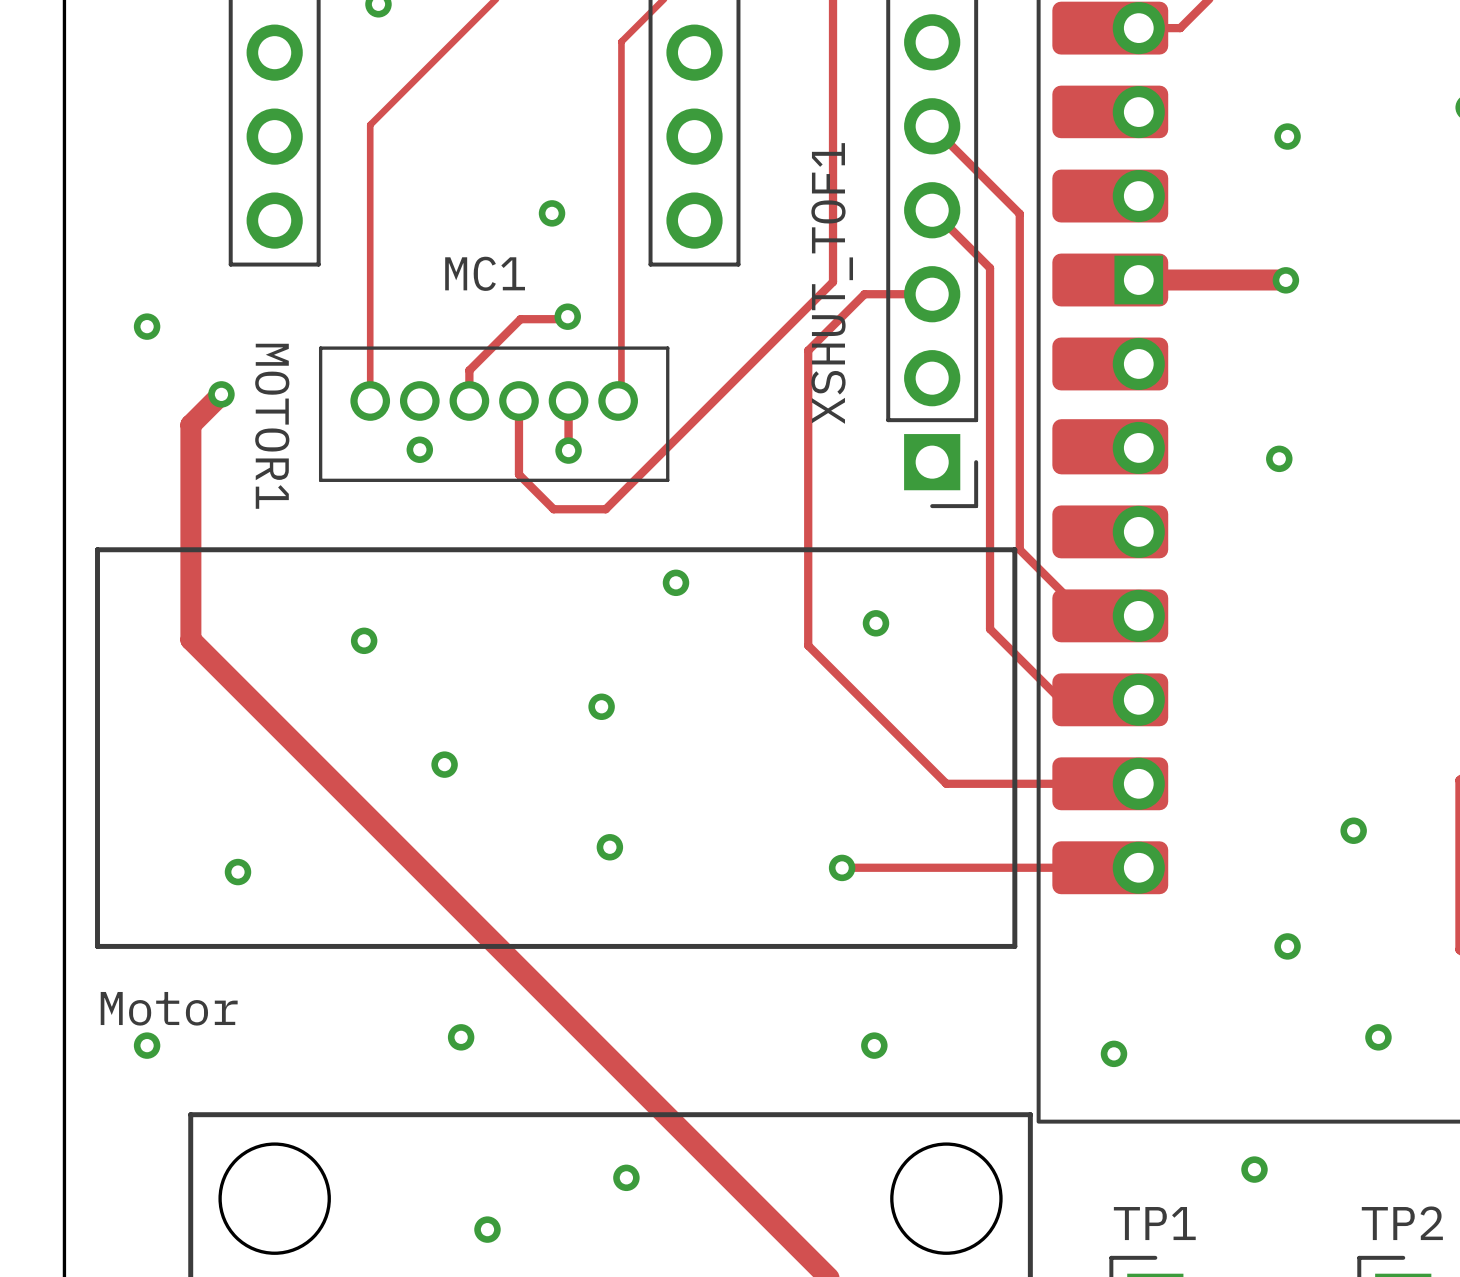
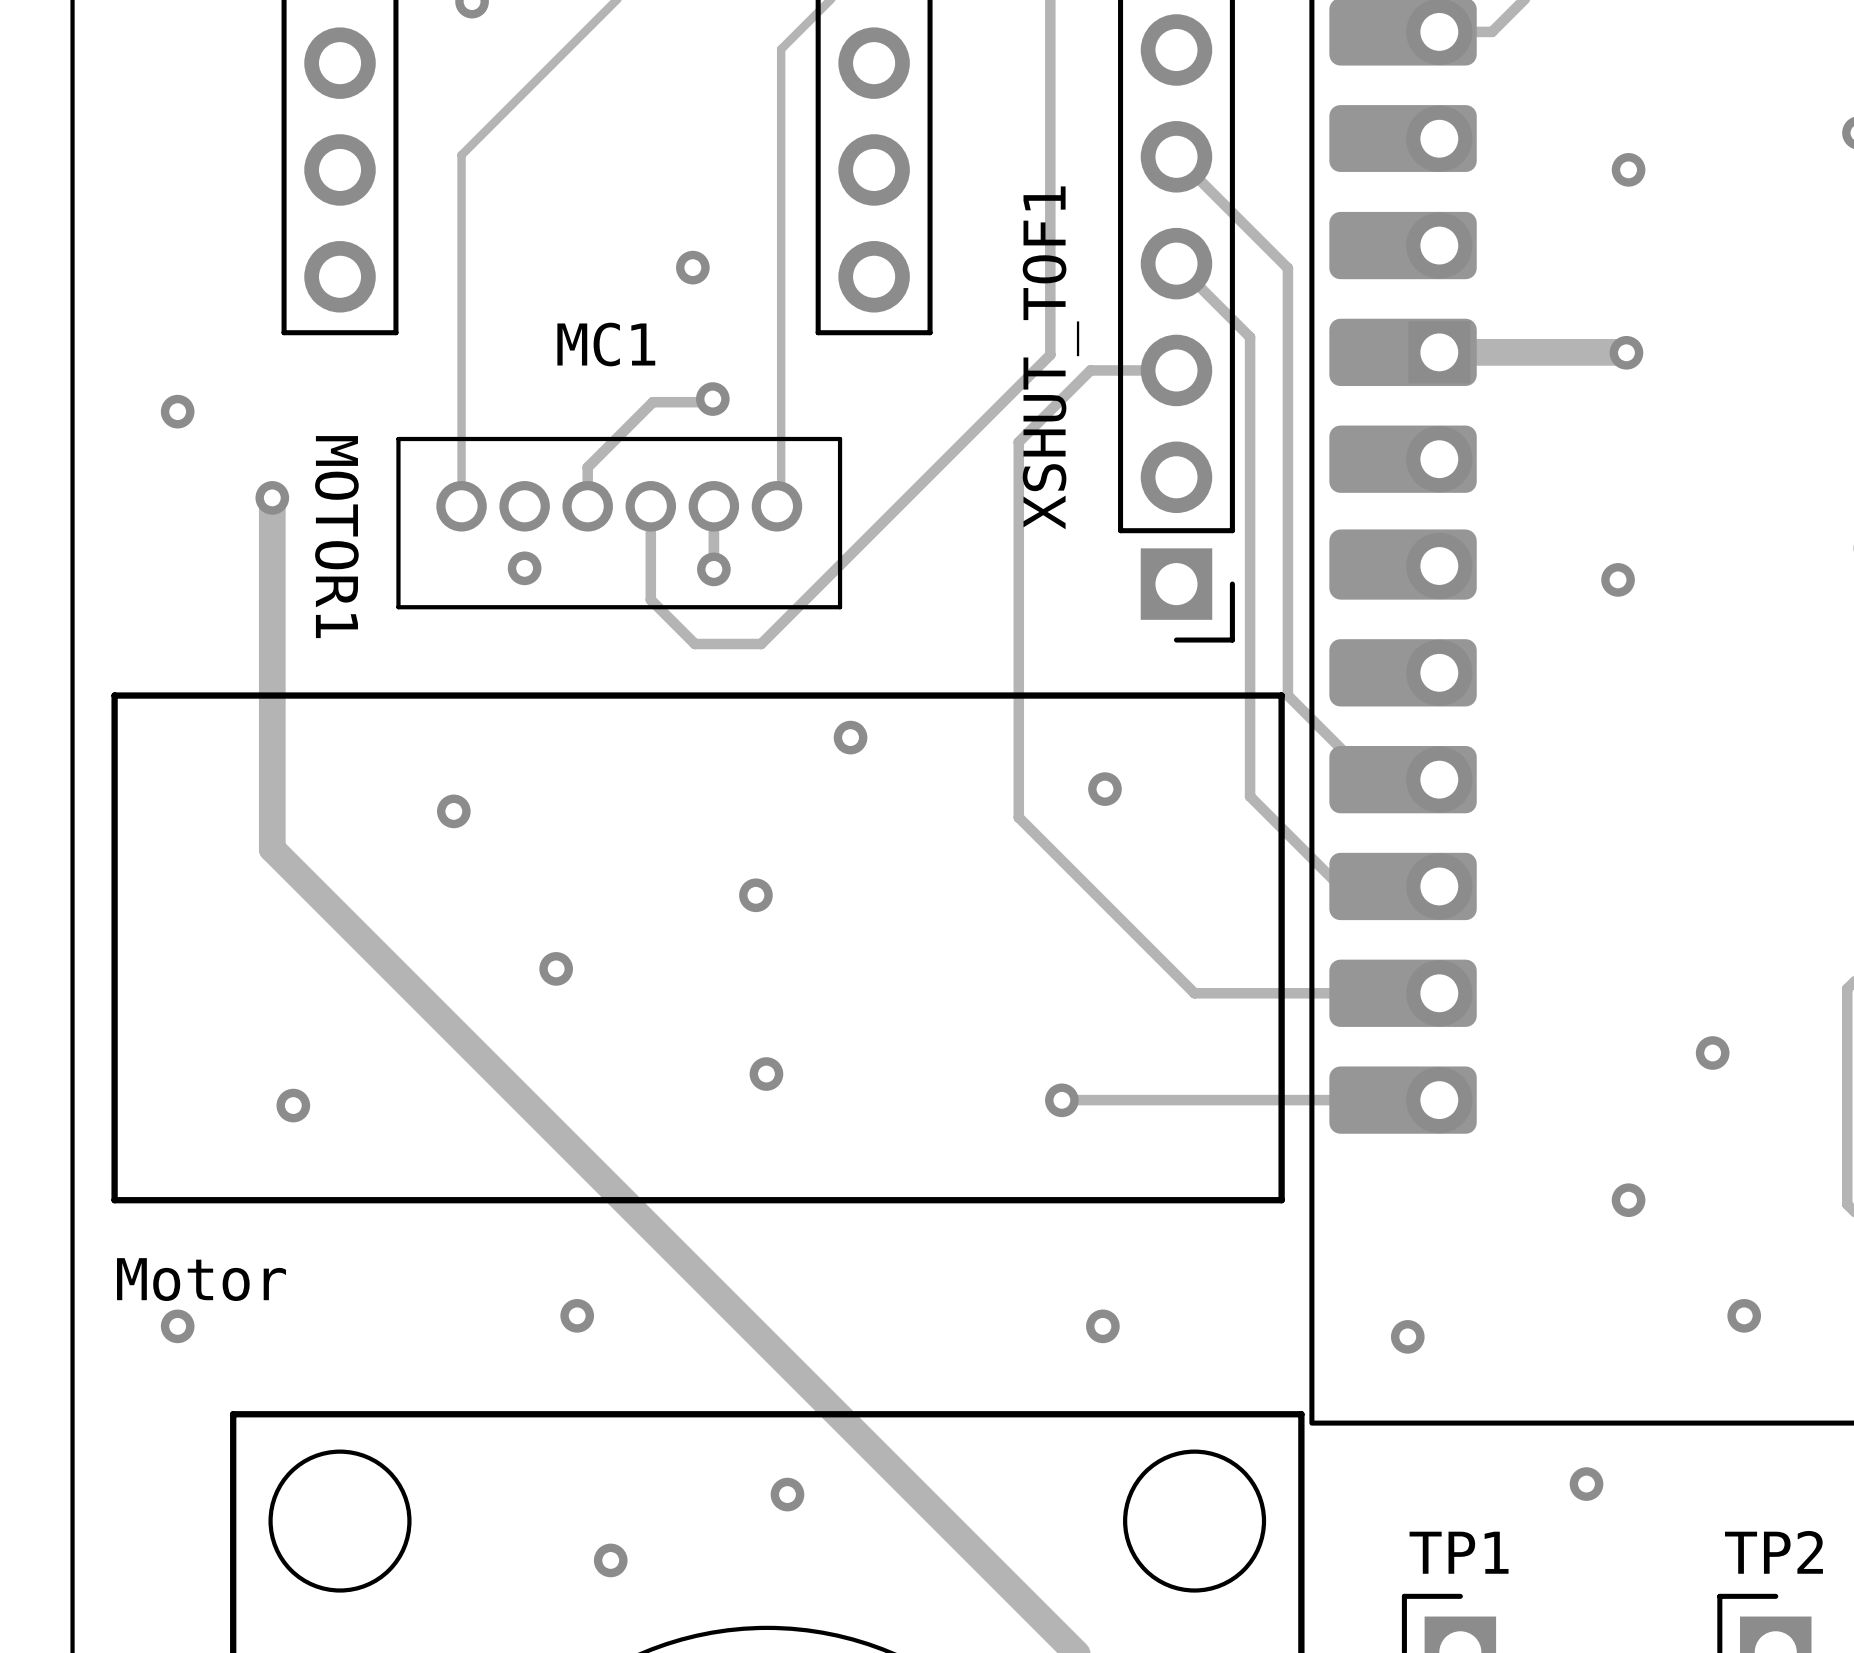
track: (221, 394) (190, 424) (190, 639) (221, 670) -> (272, 497) (272, 849)

